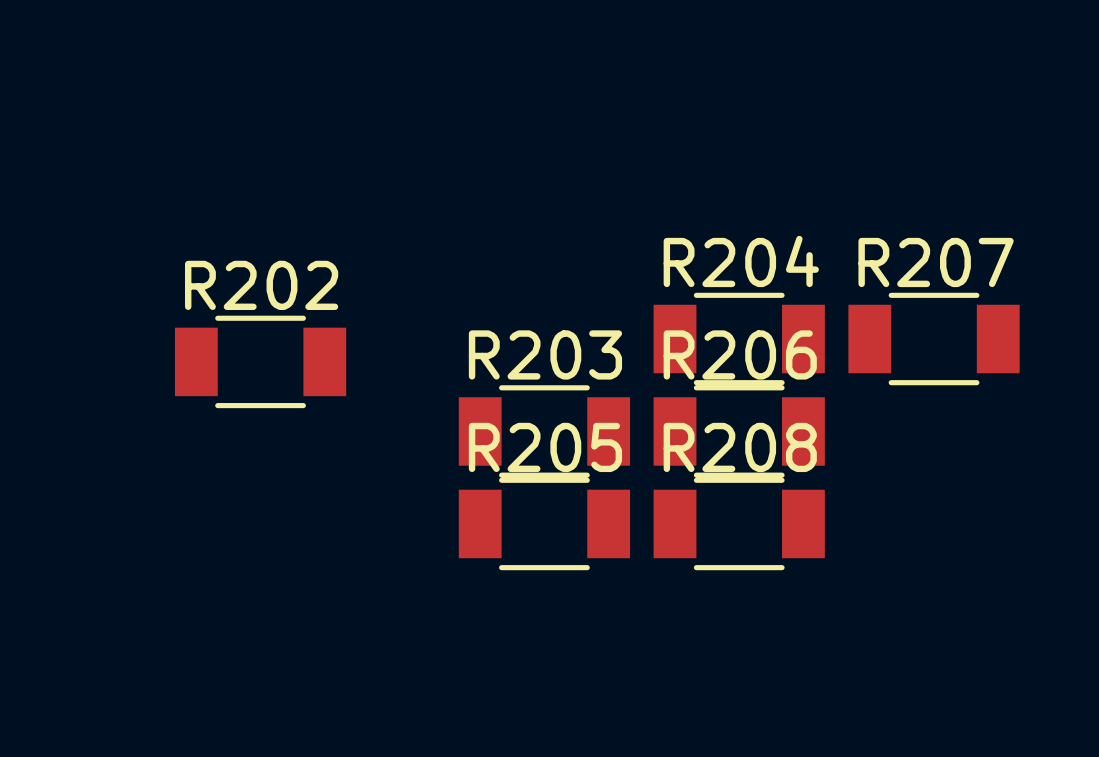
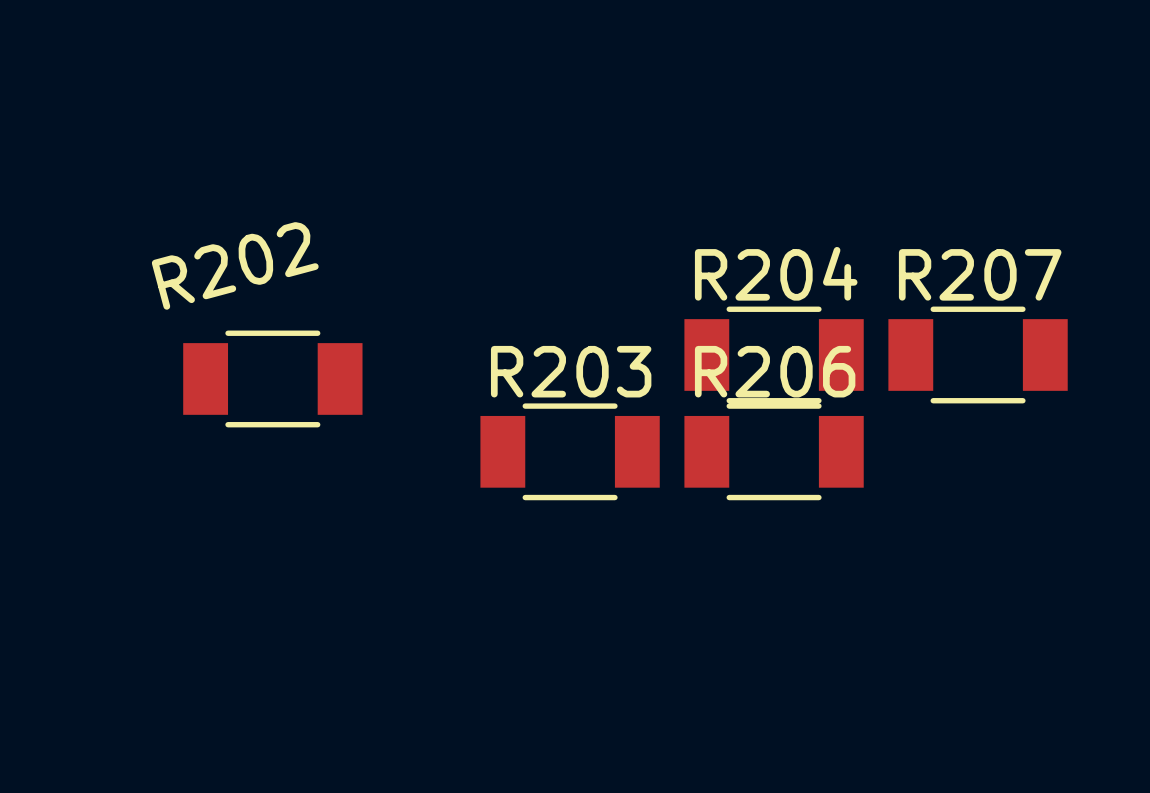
R202 name rotation: 0° (261, 285) -> 15° counterclockwise (235, 265)
R205: (544, 523) -> none
R208: (739, 523) -> none

